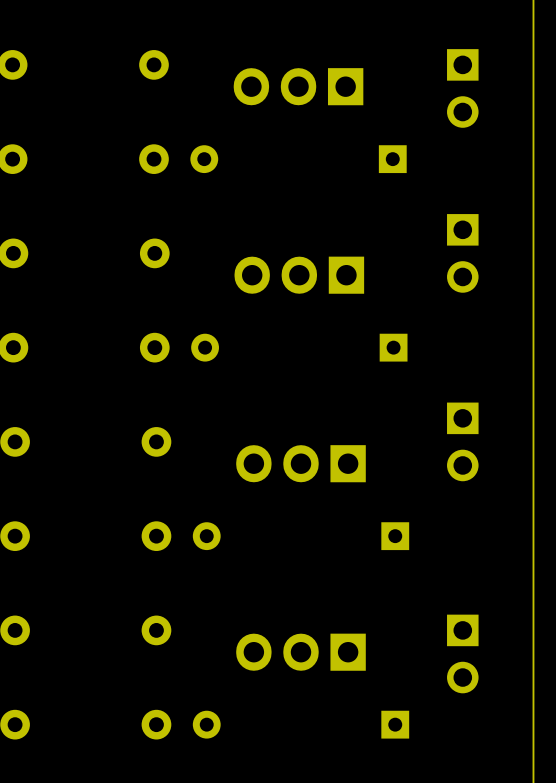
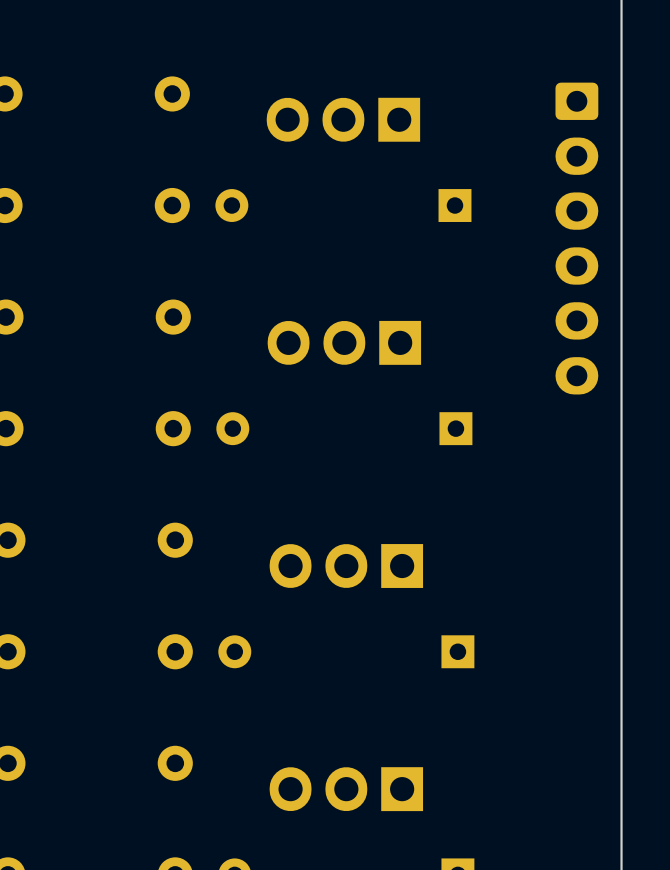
part: (462, 88) -> none
part: none -> (576, 238)
part: (462, 253) -> none
part: (462, 441) -> none
part: (462, 653) -> none

